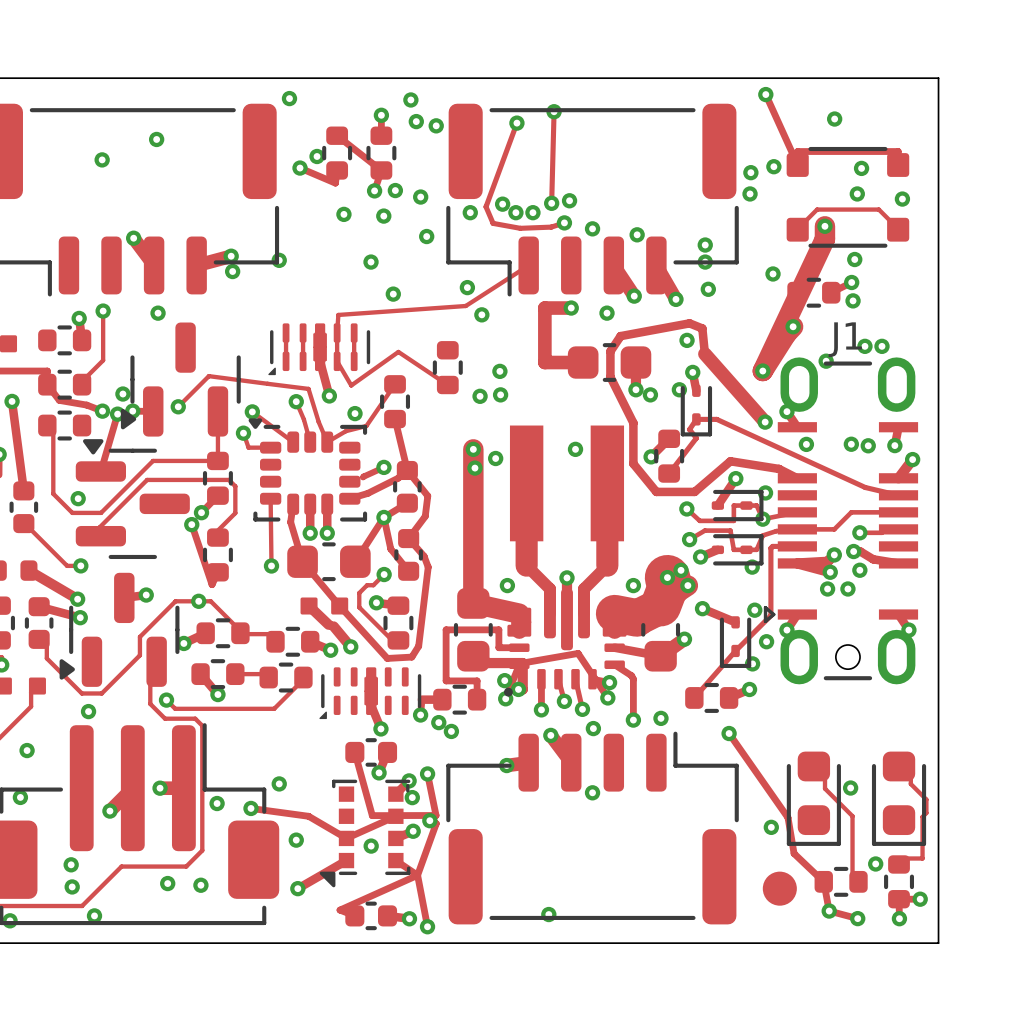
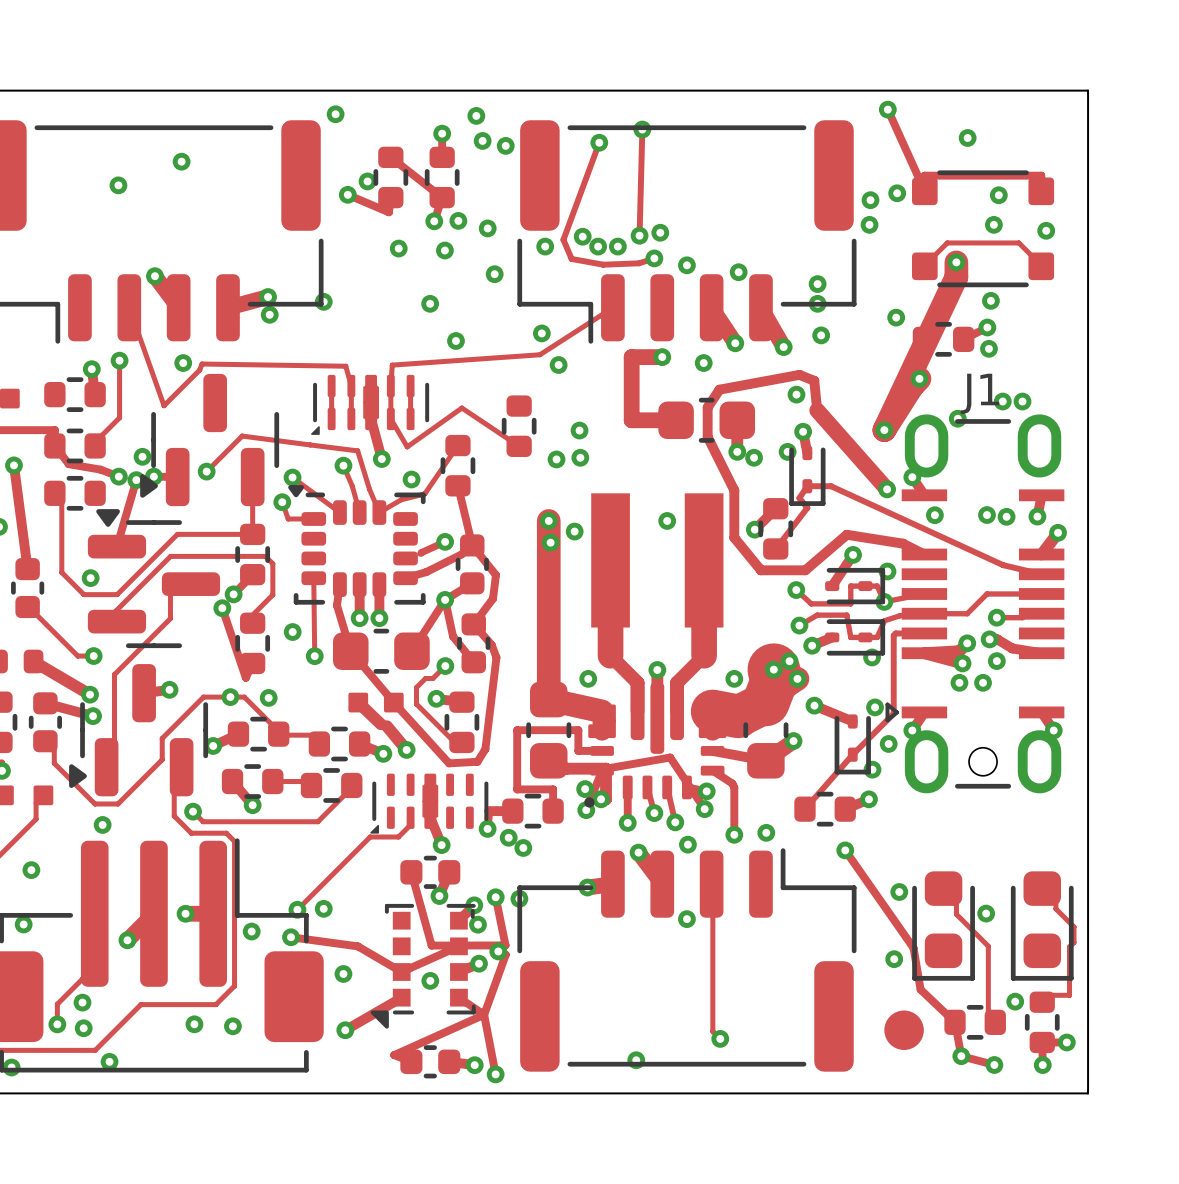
track: none -> (129, 307) (164, 405) (199, 370) (202, 364) (345, 366) (351, 386)
track: none -> (170, 593) (170, 618) (114, 674) (114, 742)
via: none -> (292, 632)
via: none -> (268, 697)
track: none -> (409, 826) (398, 837) (370, 837) (297, 909)
via: none -> (899, 892)
via: none -> (519, 898)
via: none -> (297, 909)
track: none -> (712, 916) (712, 1031) (720, 1038)
track: none -> (88, 979) (82, 979) (57, 1004) (57, 1024)
via: none -> (57, 1024)
via: none -> (720, 1038)

